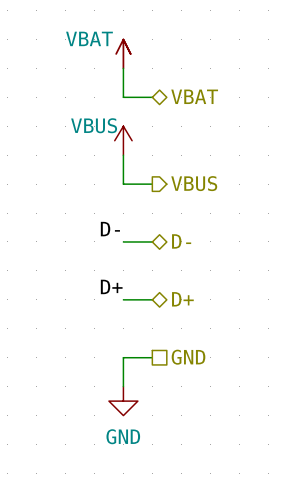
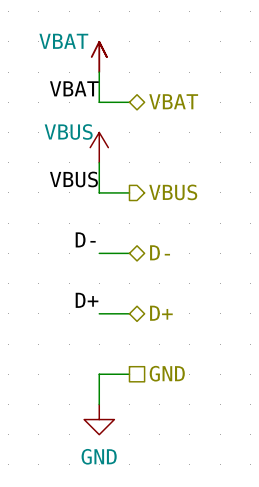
label: none -> VBAT (74, 88)
label: none -> VBUS (73, 179)

